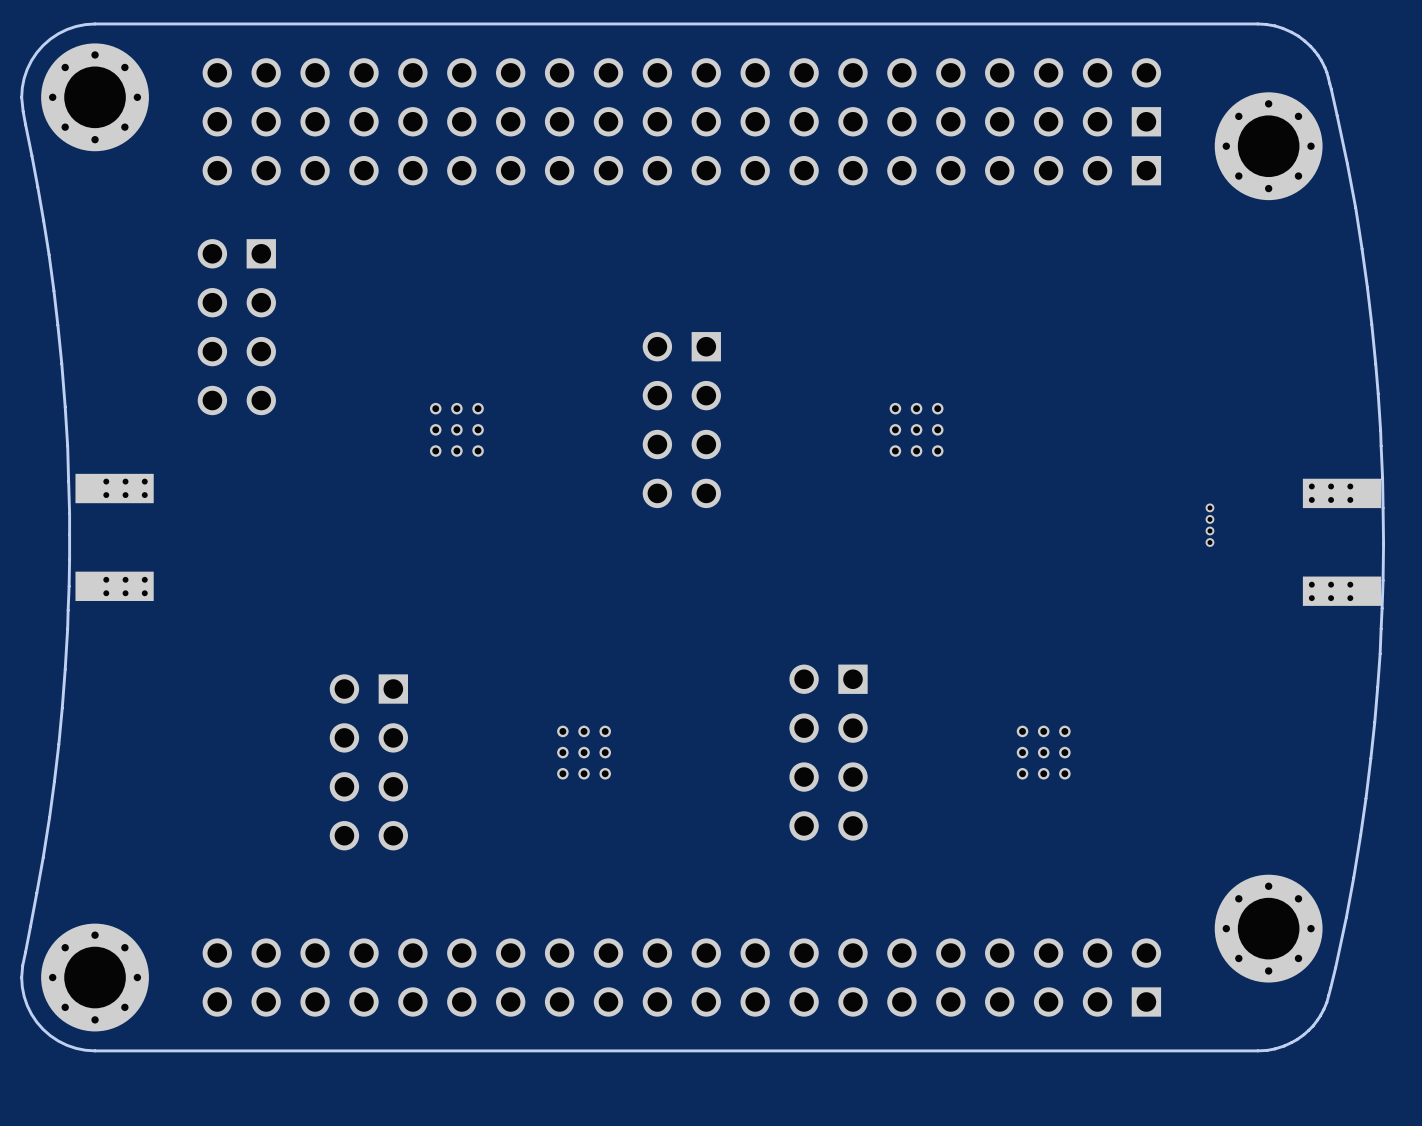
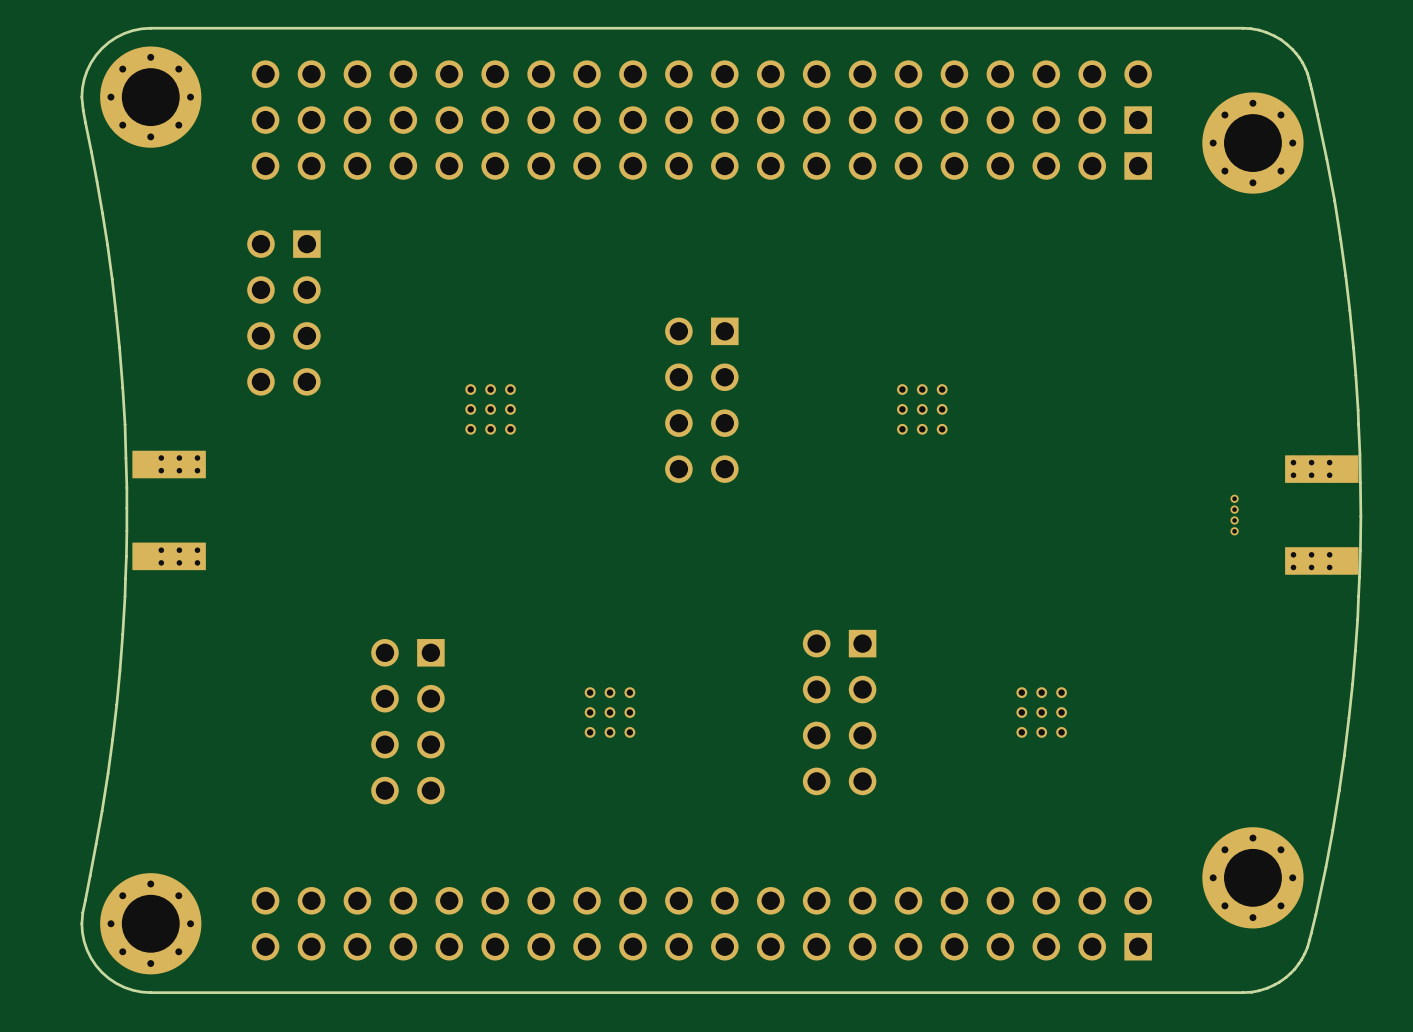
part position: (1209, 525) -> (1234, 515)

